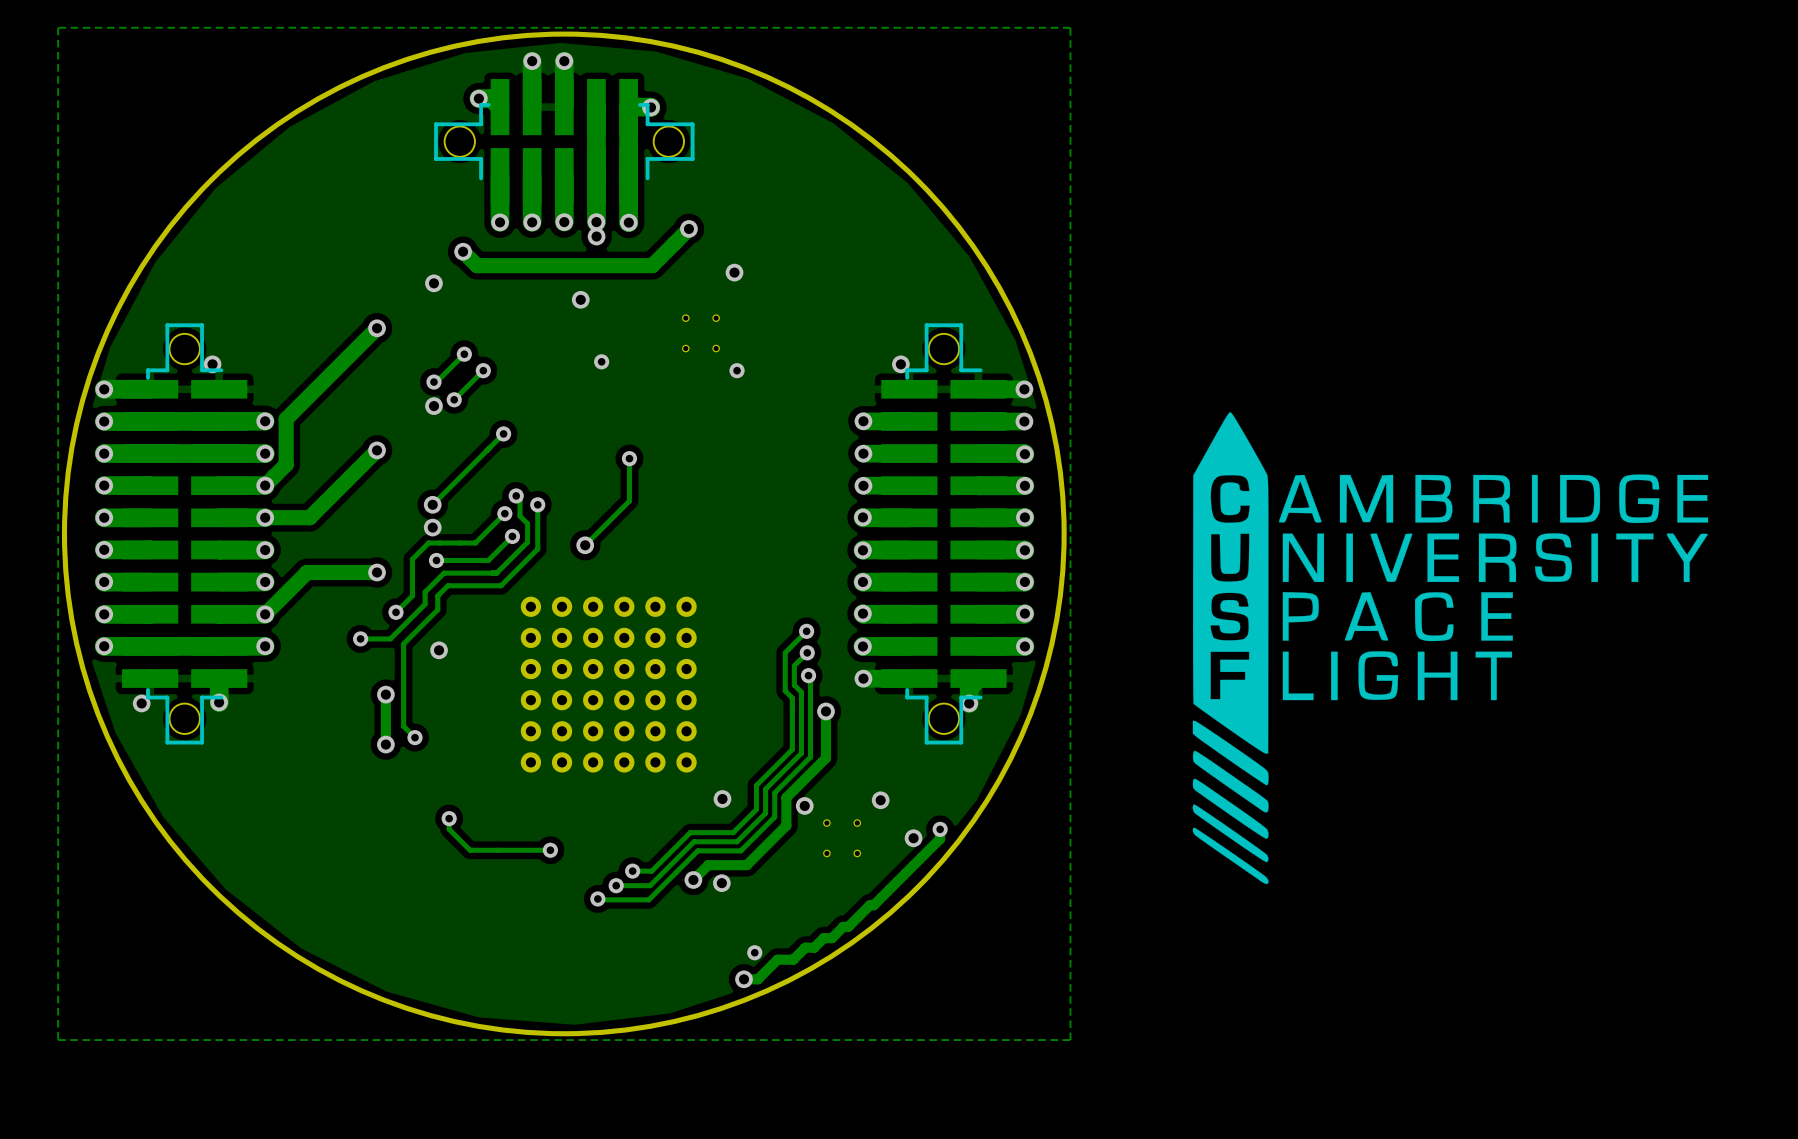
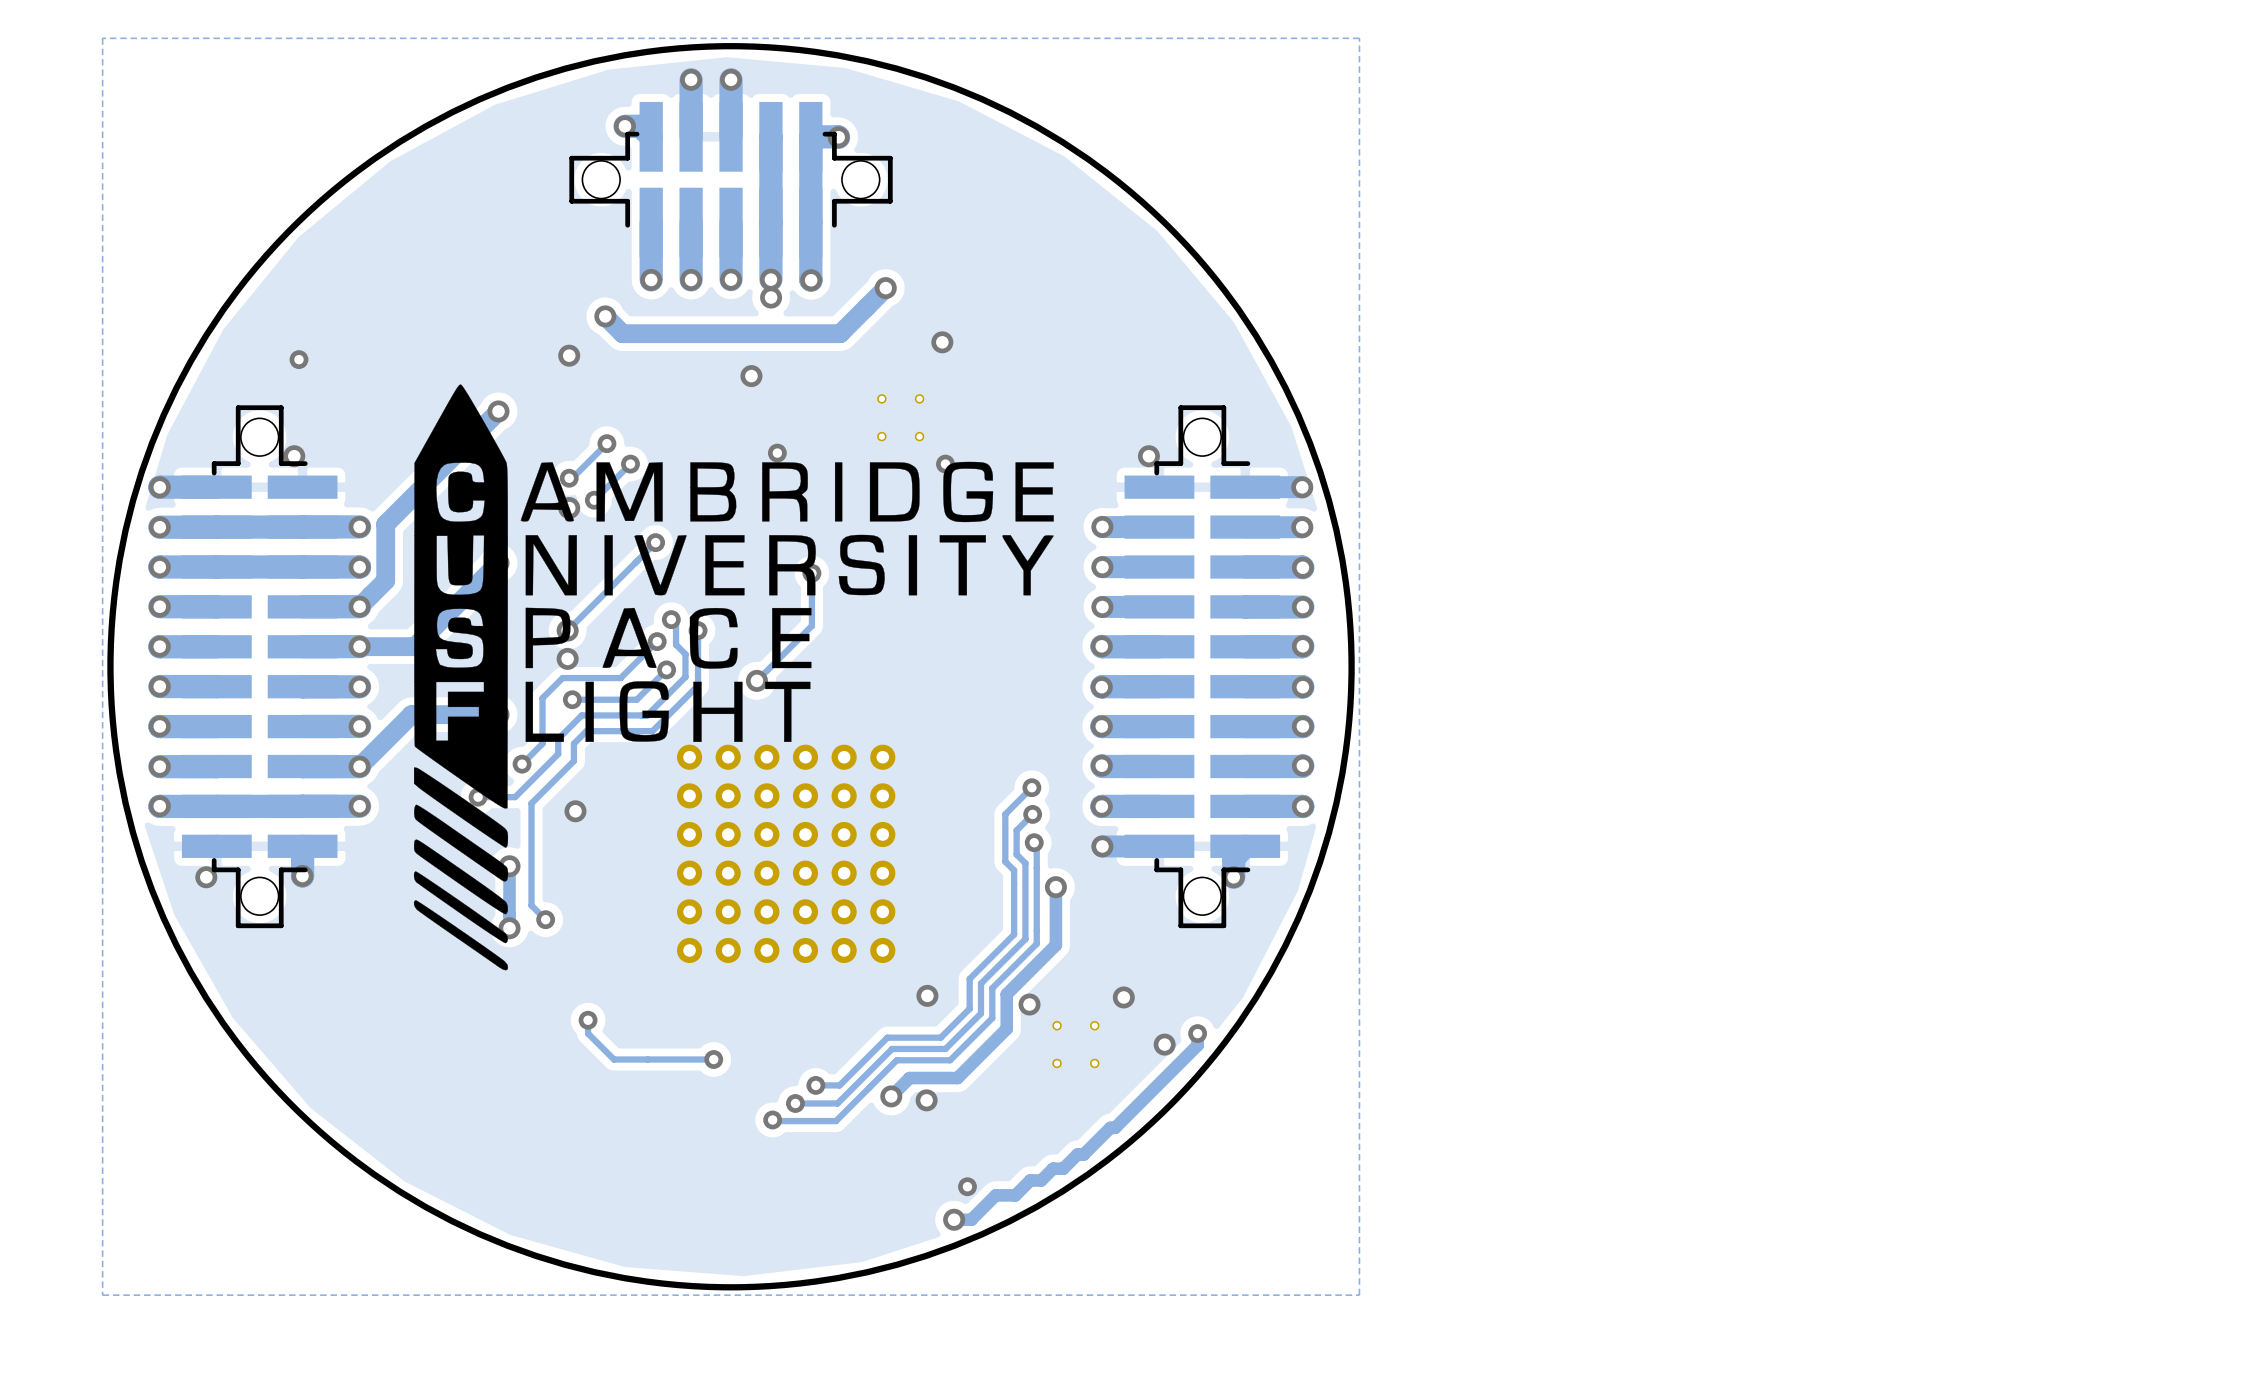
via: none -> (298, 359)
drawing: none -> [413, 384, 1054, 971]
drawing: [1192, 412, 1709, 885] -> none

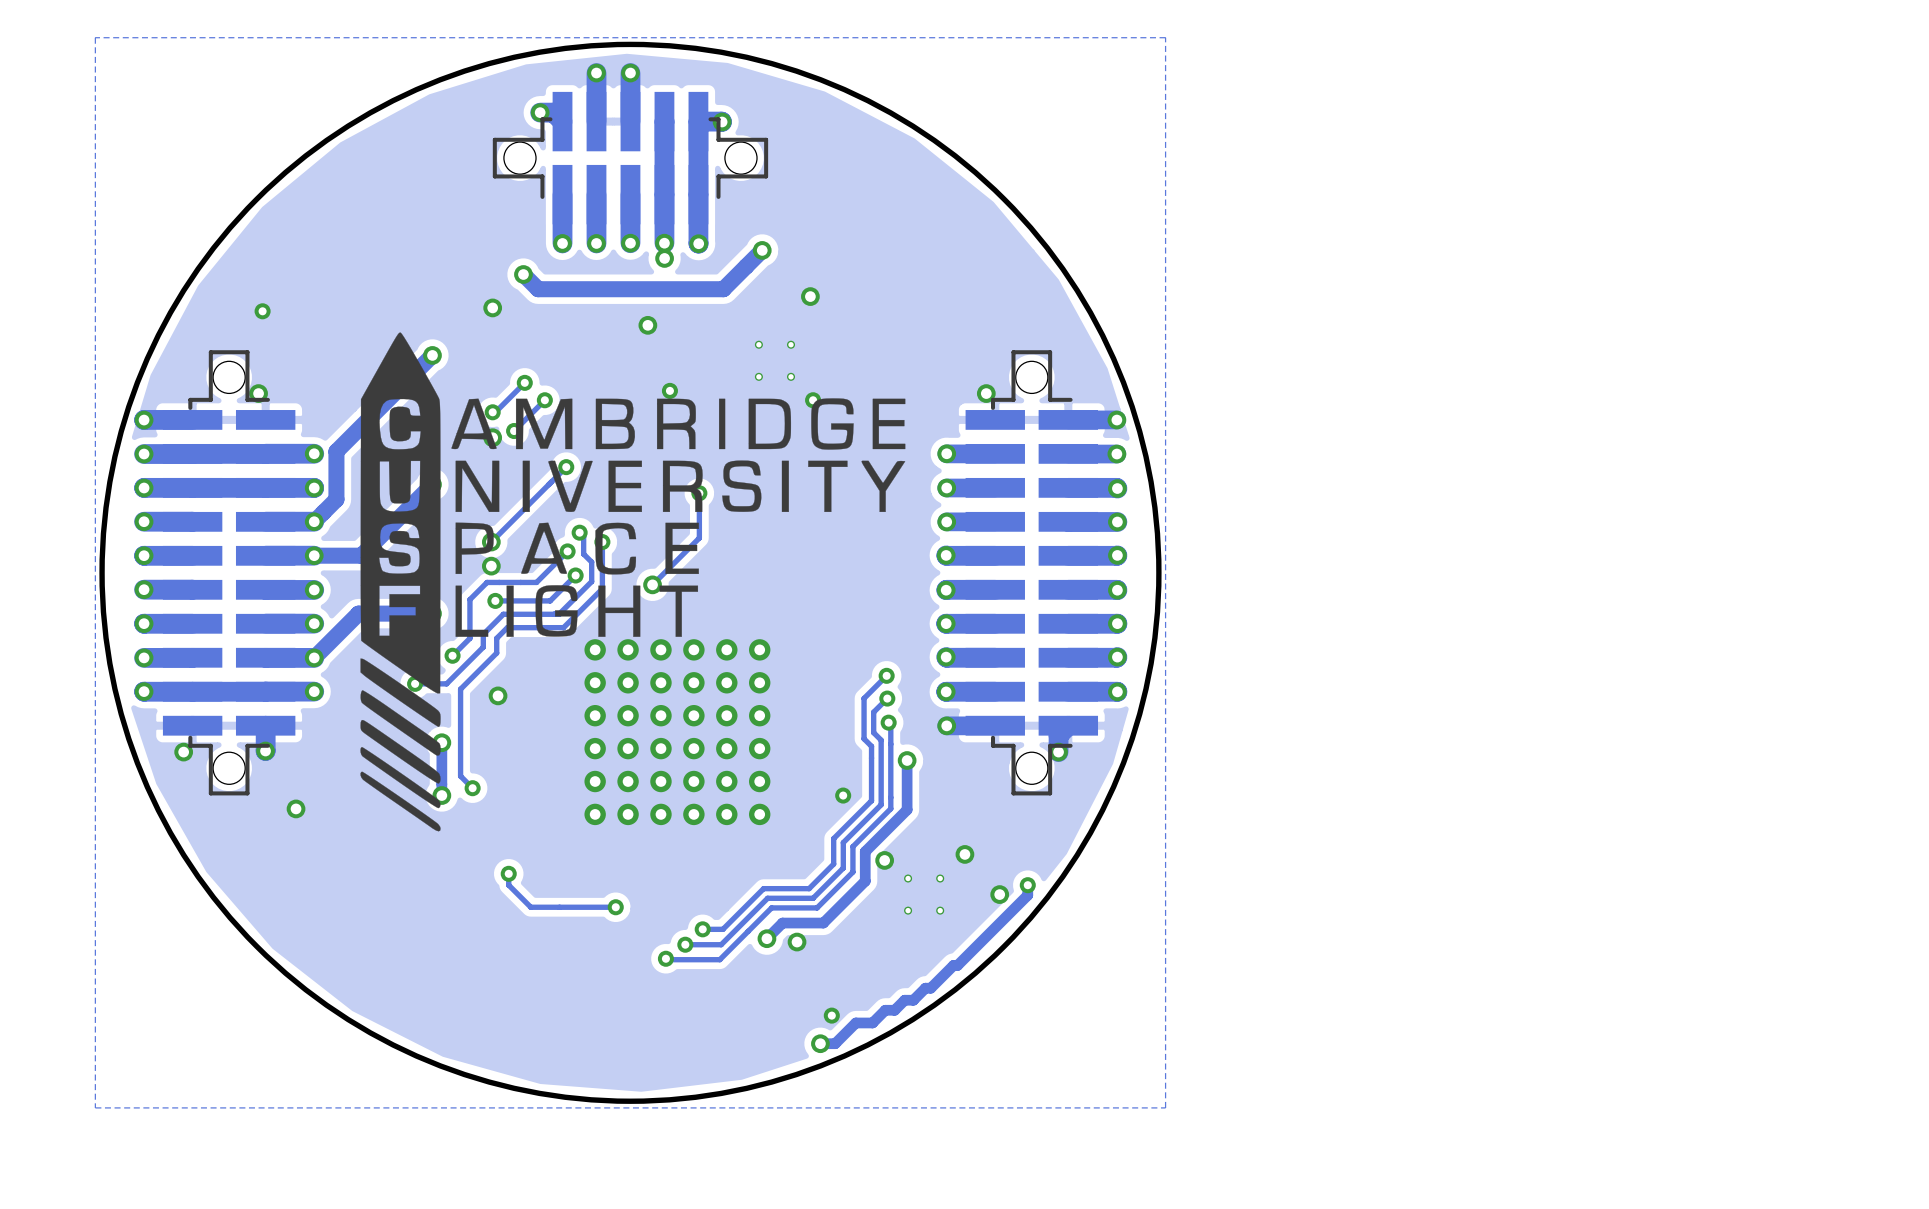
via: none -> (843, 795)
via: none -> (296, 808)
via: (927, 995) -> none

